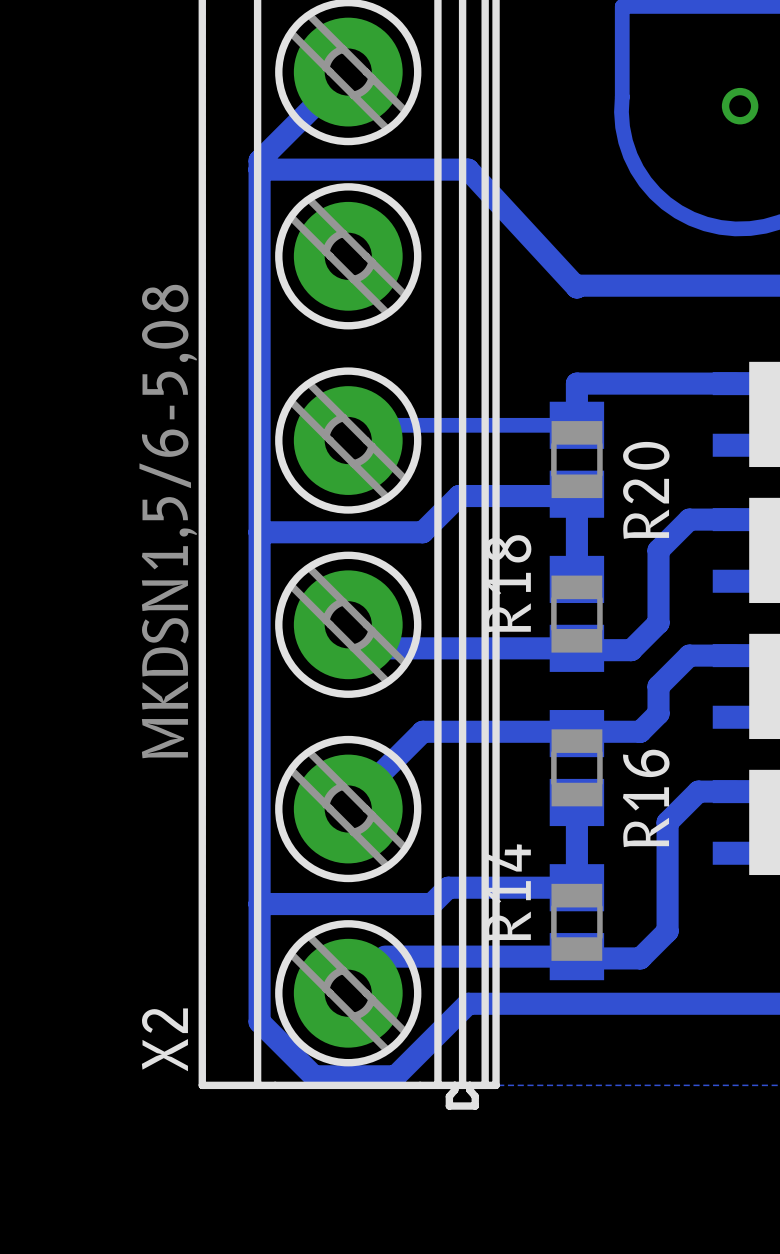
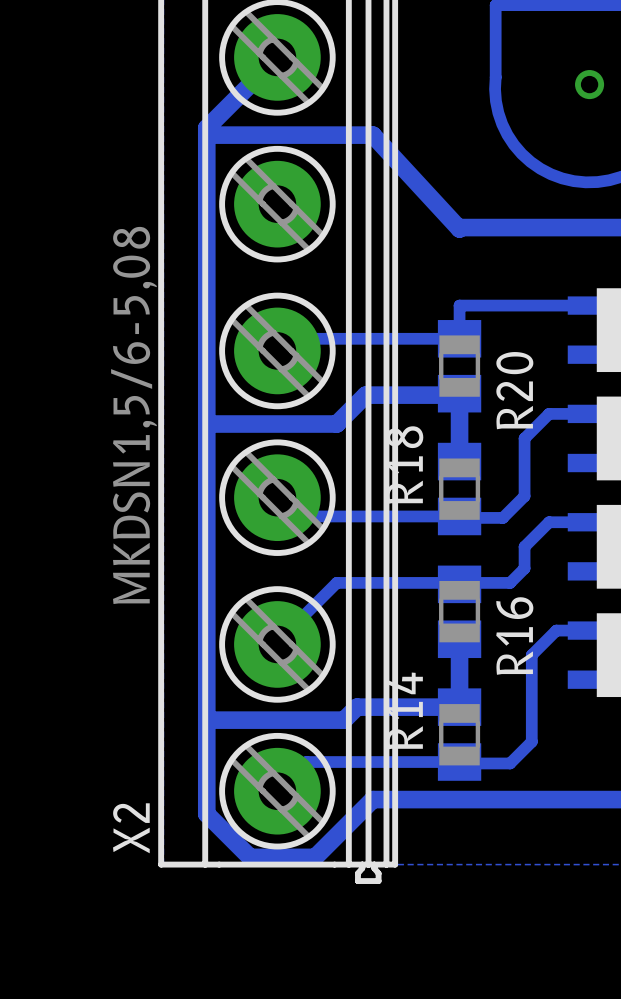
bottom track width: thick (735, 383) (576, 383) (576, 425) -> thin (586, 305) (459, 305) (459, 338)
bottom track width: thick (735, 519) (689, 519) (658, 550) (658, 622) (631, 650) (578, 650) -> thin (586, 413) (549, 413) (524, 438) (524, 496) (502, 517) (461, 517)
bottom track width: thick (576, 648) (371, 648) -> thin (459, 516) (296, 516)
bottom track width: thick (735, 655) (689, 655) (658, 686) (658, 713) (640, 731) (578, 731) -> thin (586, 522) (549, 522) (524, 546) (524, 568) (510, 582) (461, 582)
bottom track width: thick (575, 731) (422, 731) (348, 806) -> thin (458, 582) (336, 582) (277, 642)
bottom track width: thick (735, 791) (698, 791) (667, 822) (667, 931) (640, 958) (578, 958) -> thin (586, 630) (556, 630) (531, 655) (531, 741) (510, 763) (461, 763)
bottom track width: thick (576, 956) (384, 956) -> thin (459, 762) (306, 762)

